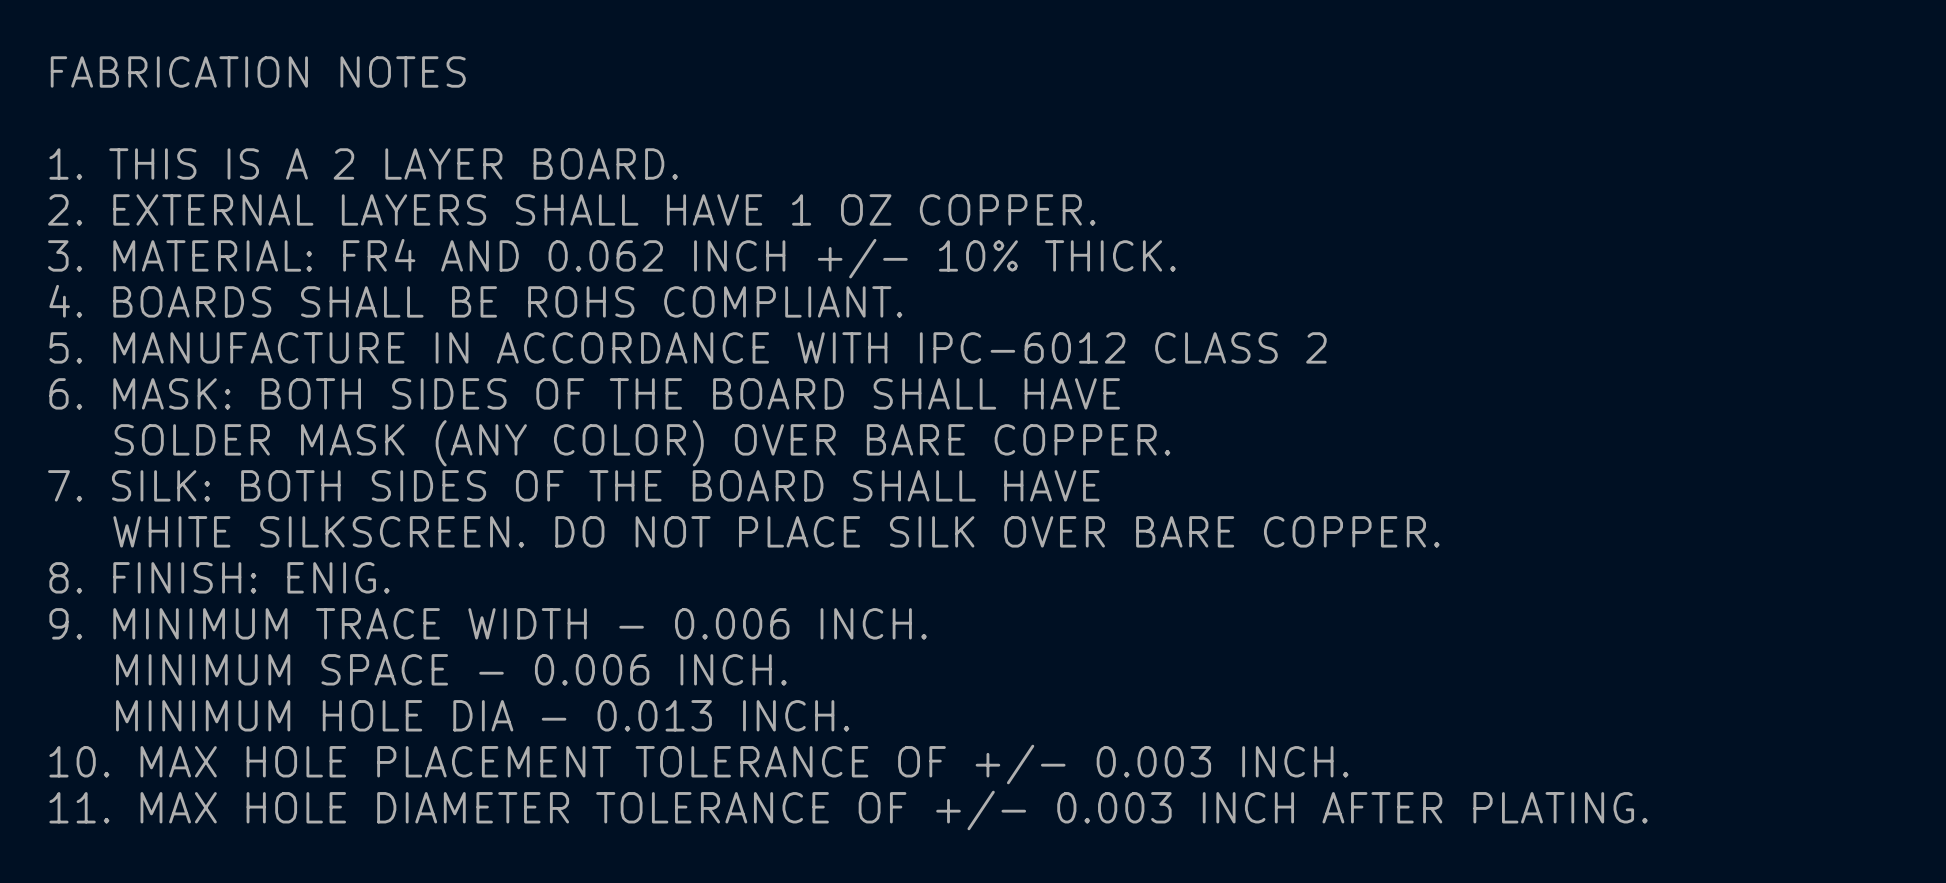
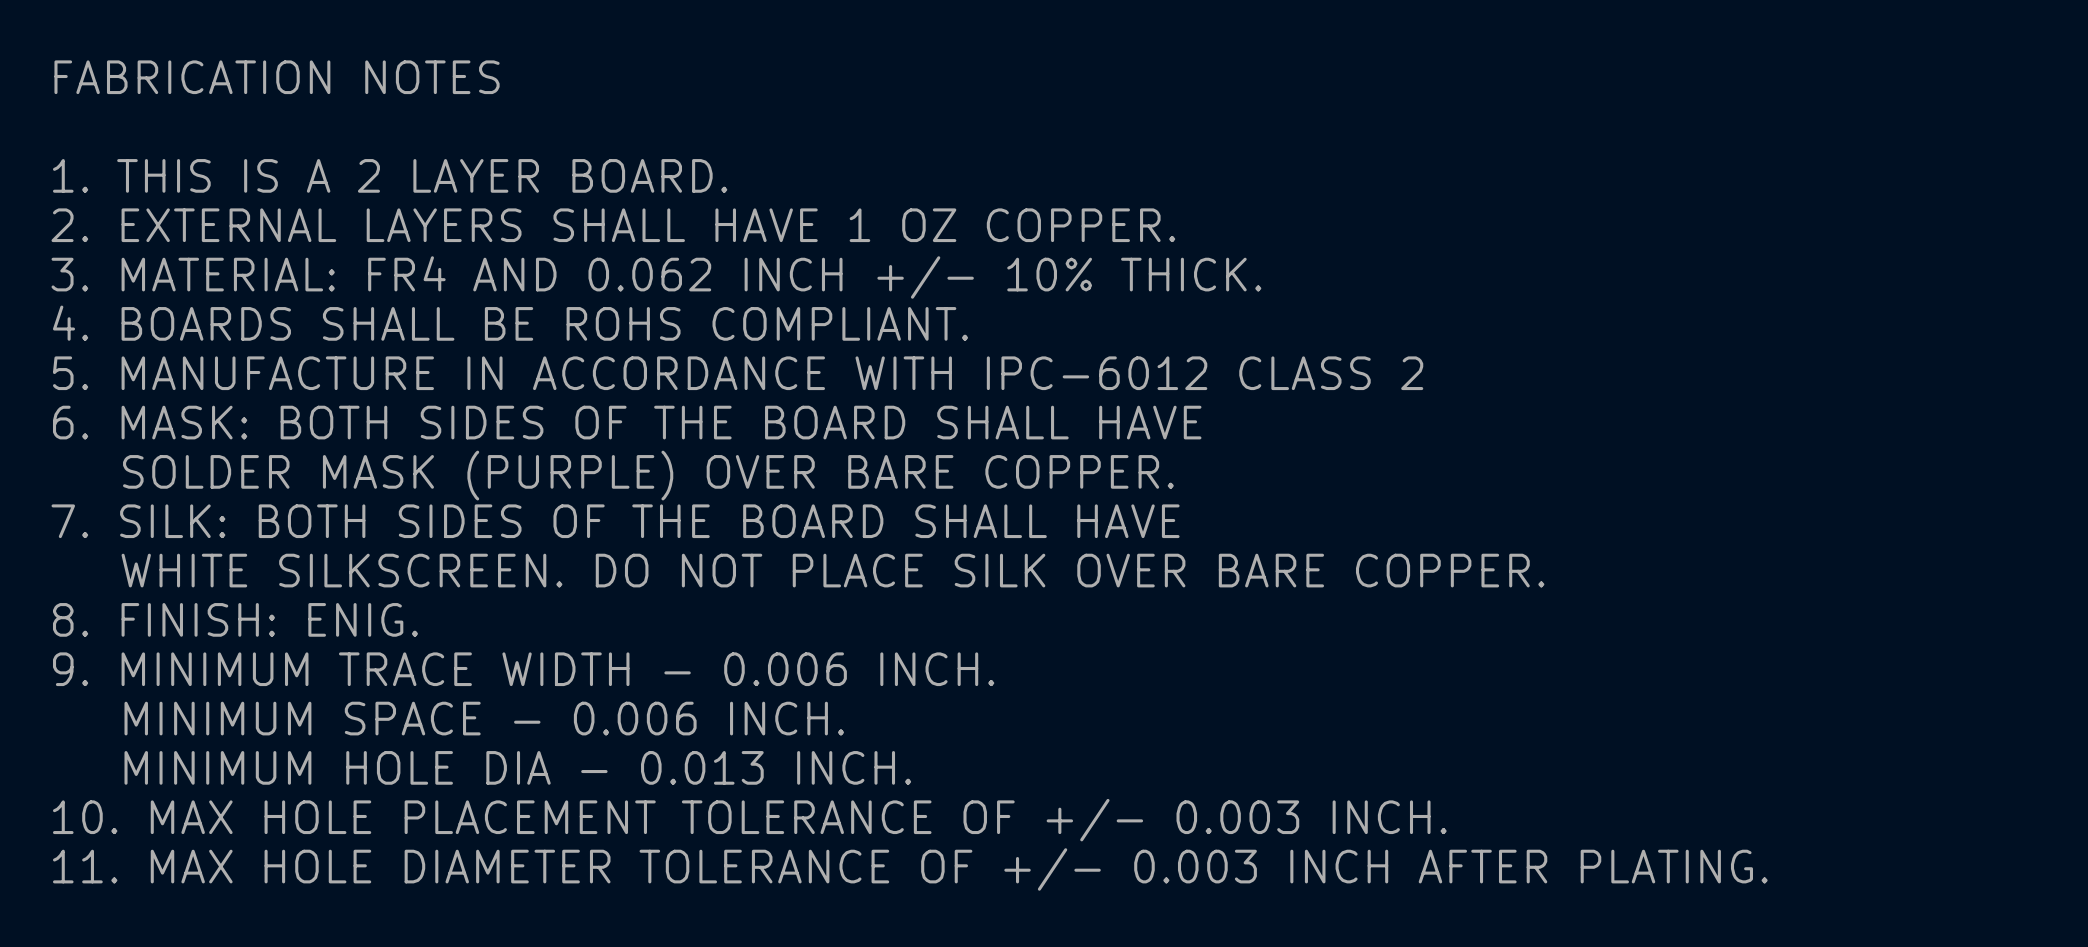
text: SOLDER MASK (ANY COLOR) OVER BARE COPPER. (642, 443) -> SOLDER MASK (PURPLE) OVER BARE COPPER. (648, 475)

